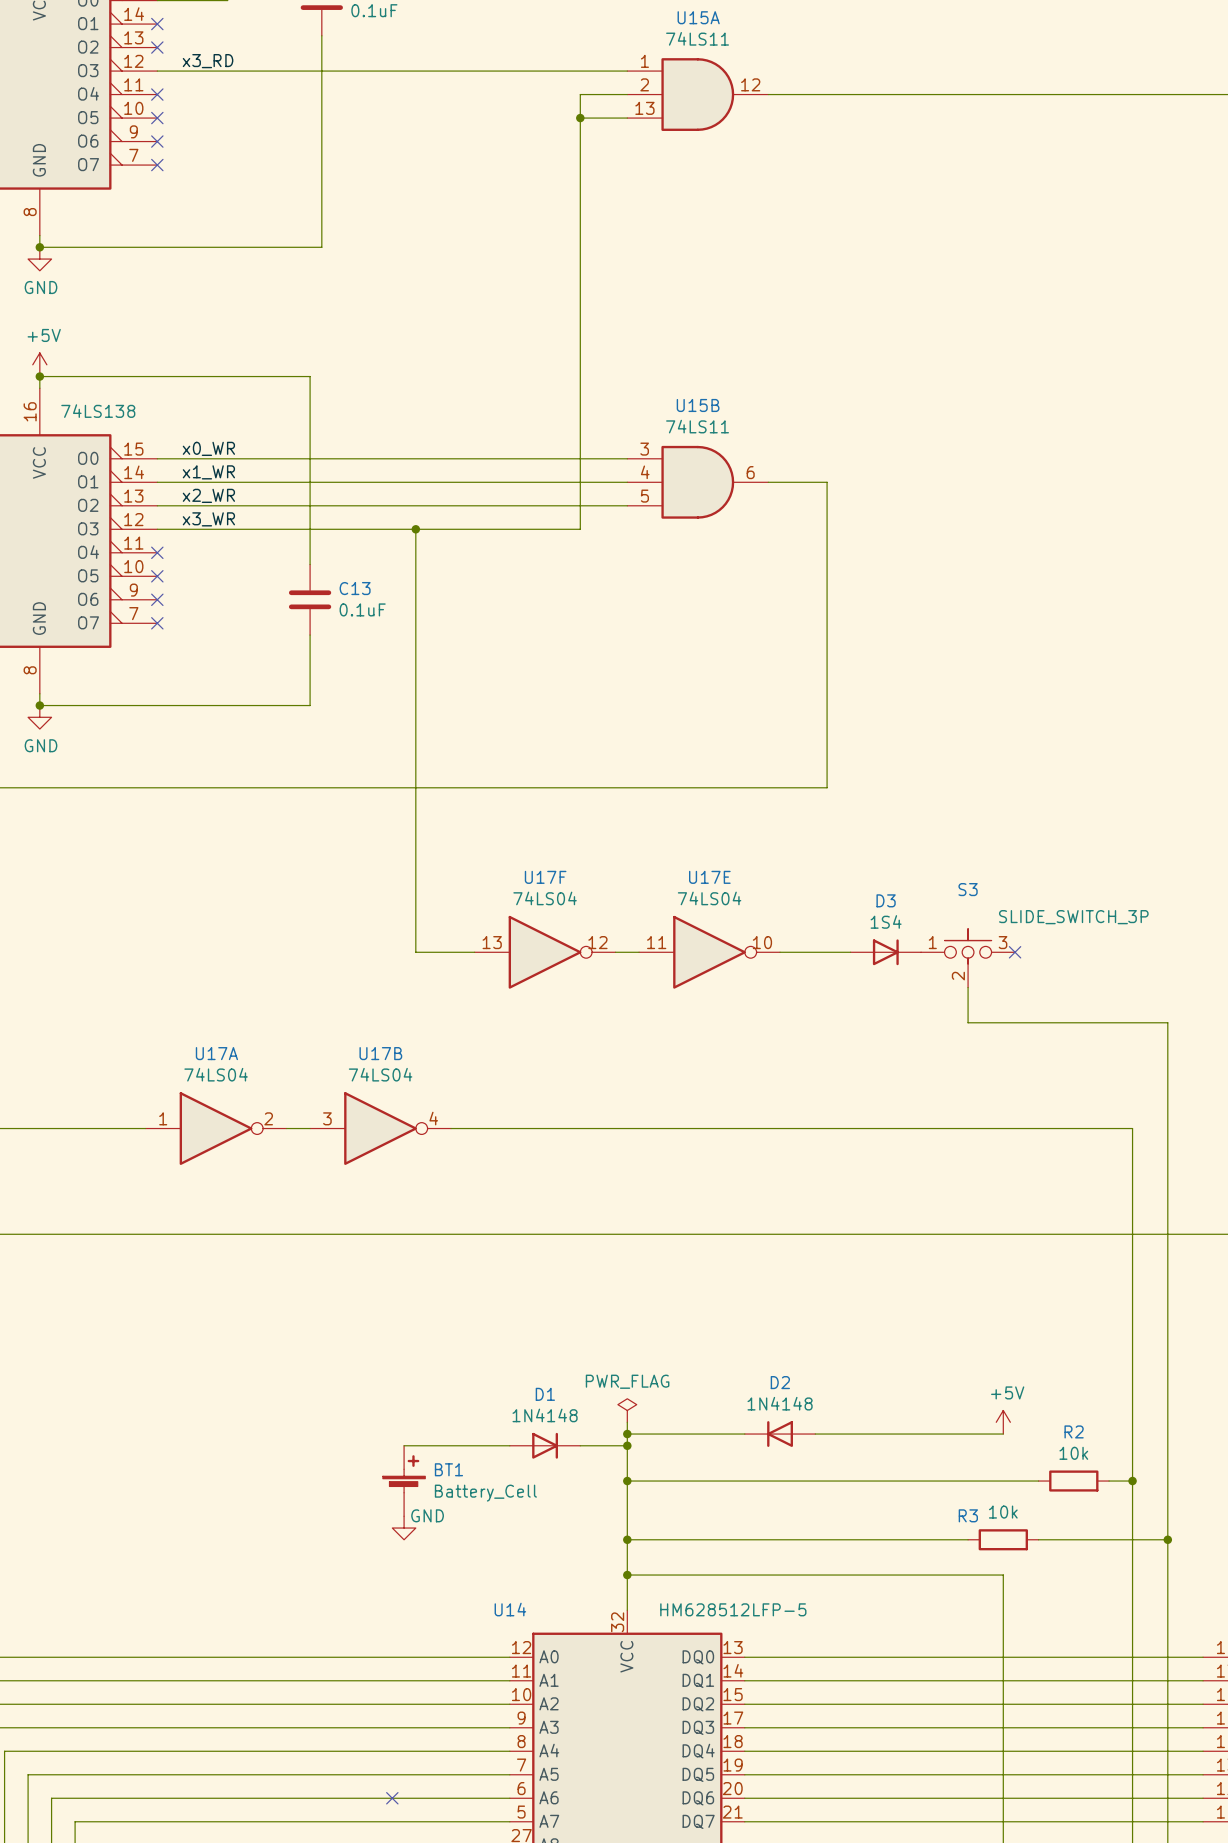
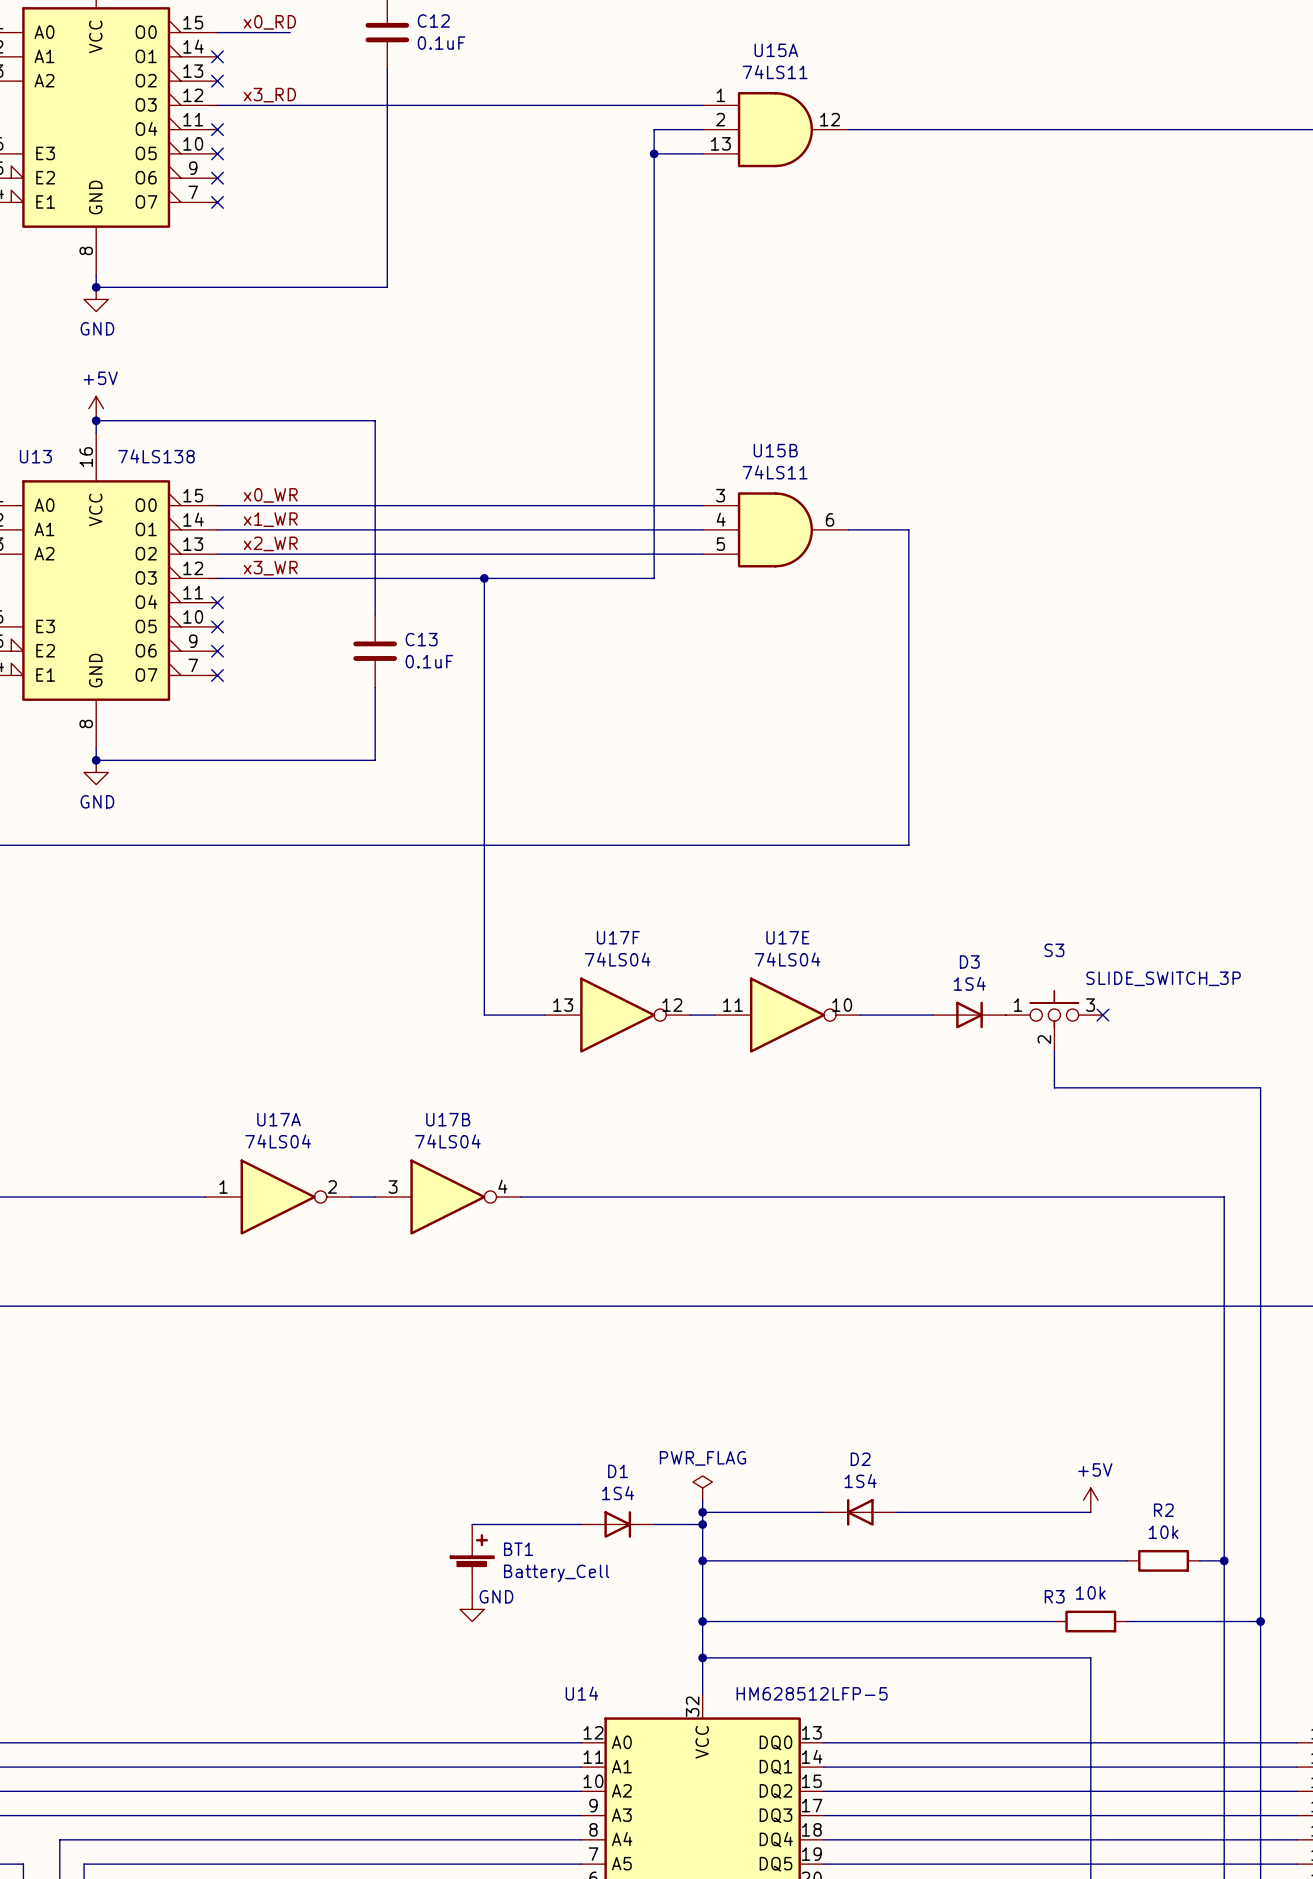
D2 value: 1N4148 (780, 1403) -> 1S4 (860, 1481)
D1 value: 1N4148 (545, 1415) -> 1S4 (618, 1493)

